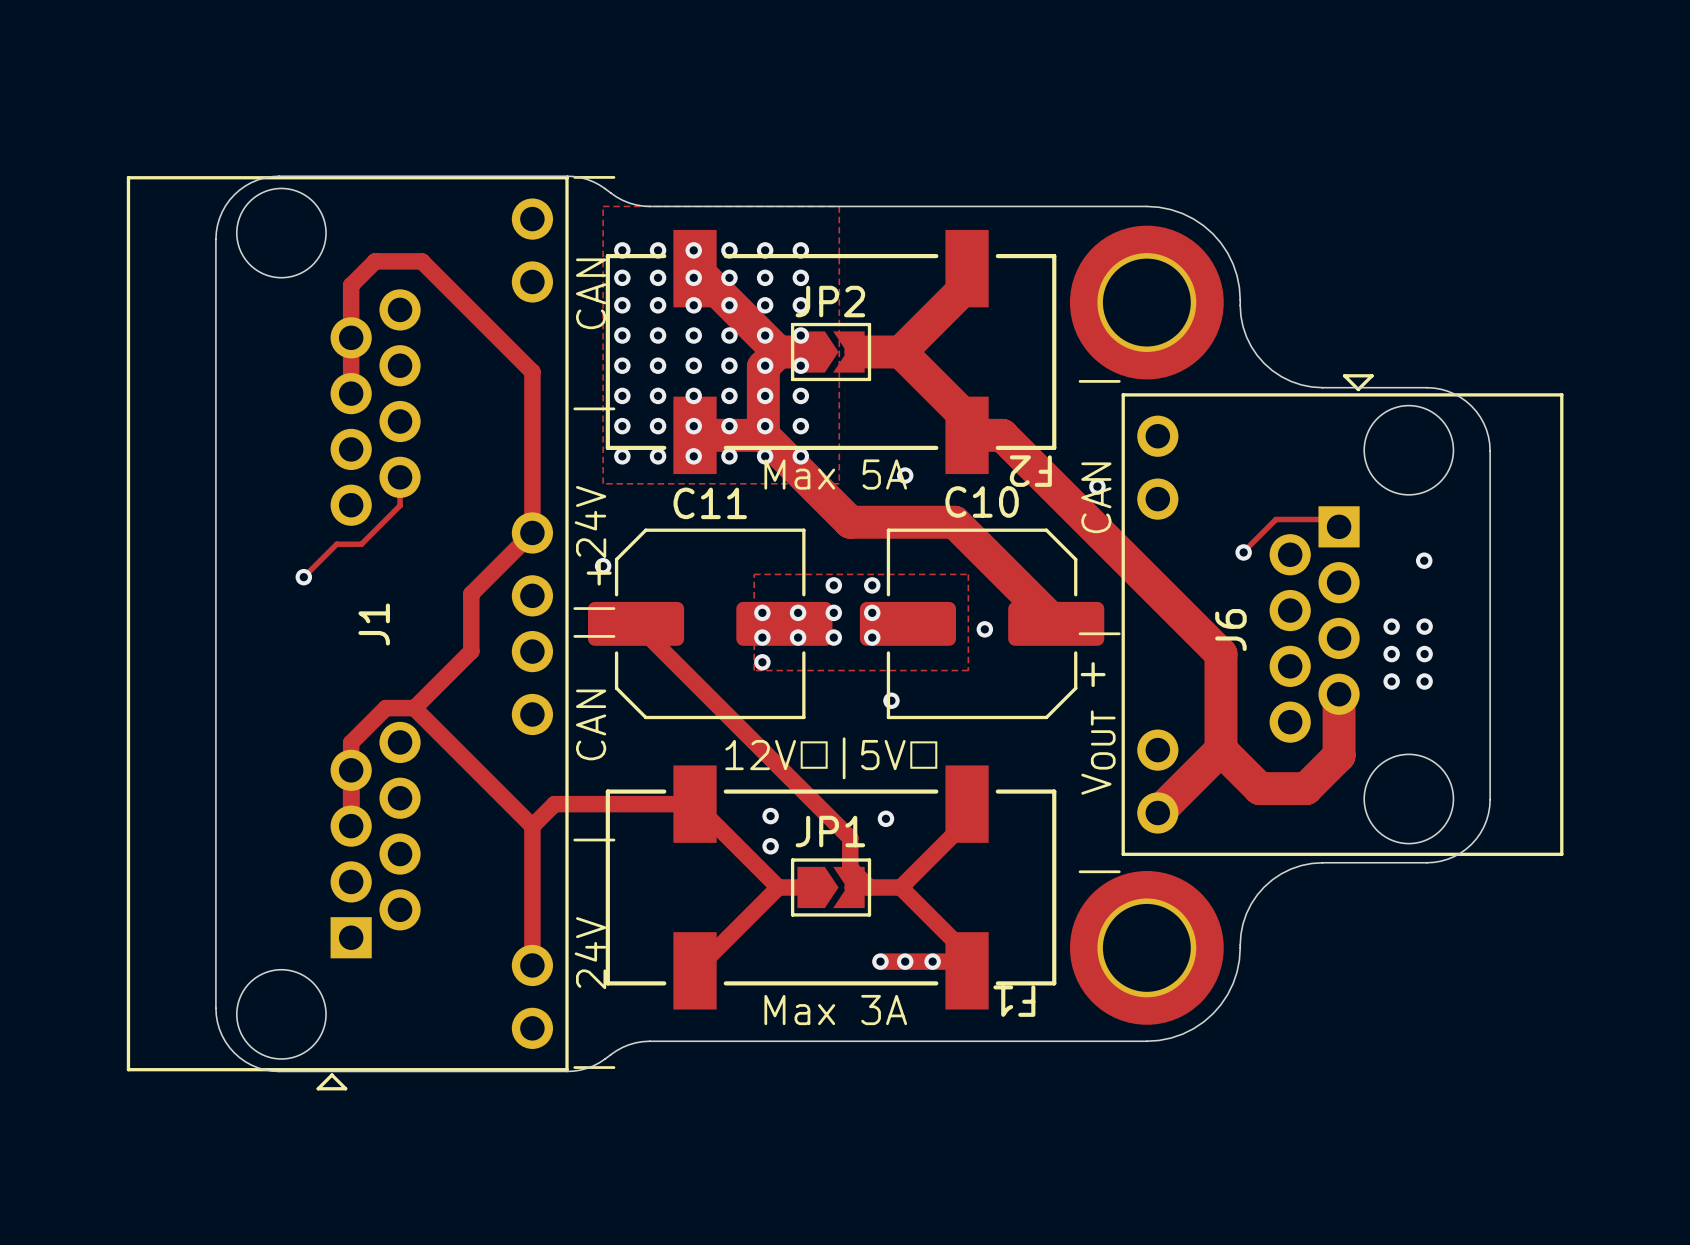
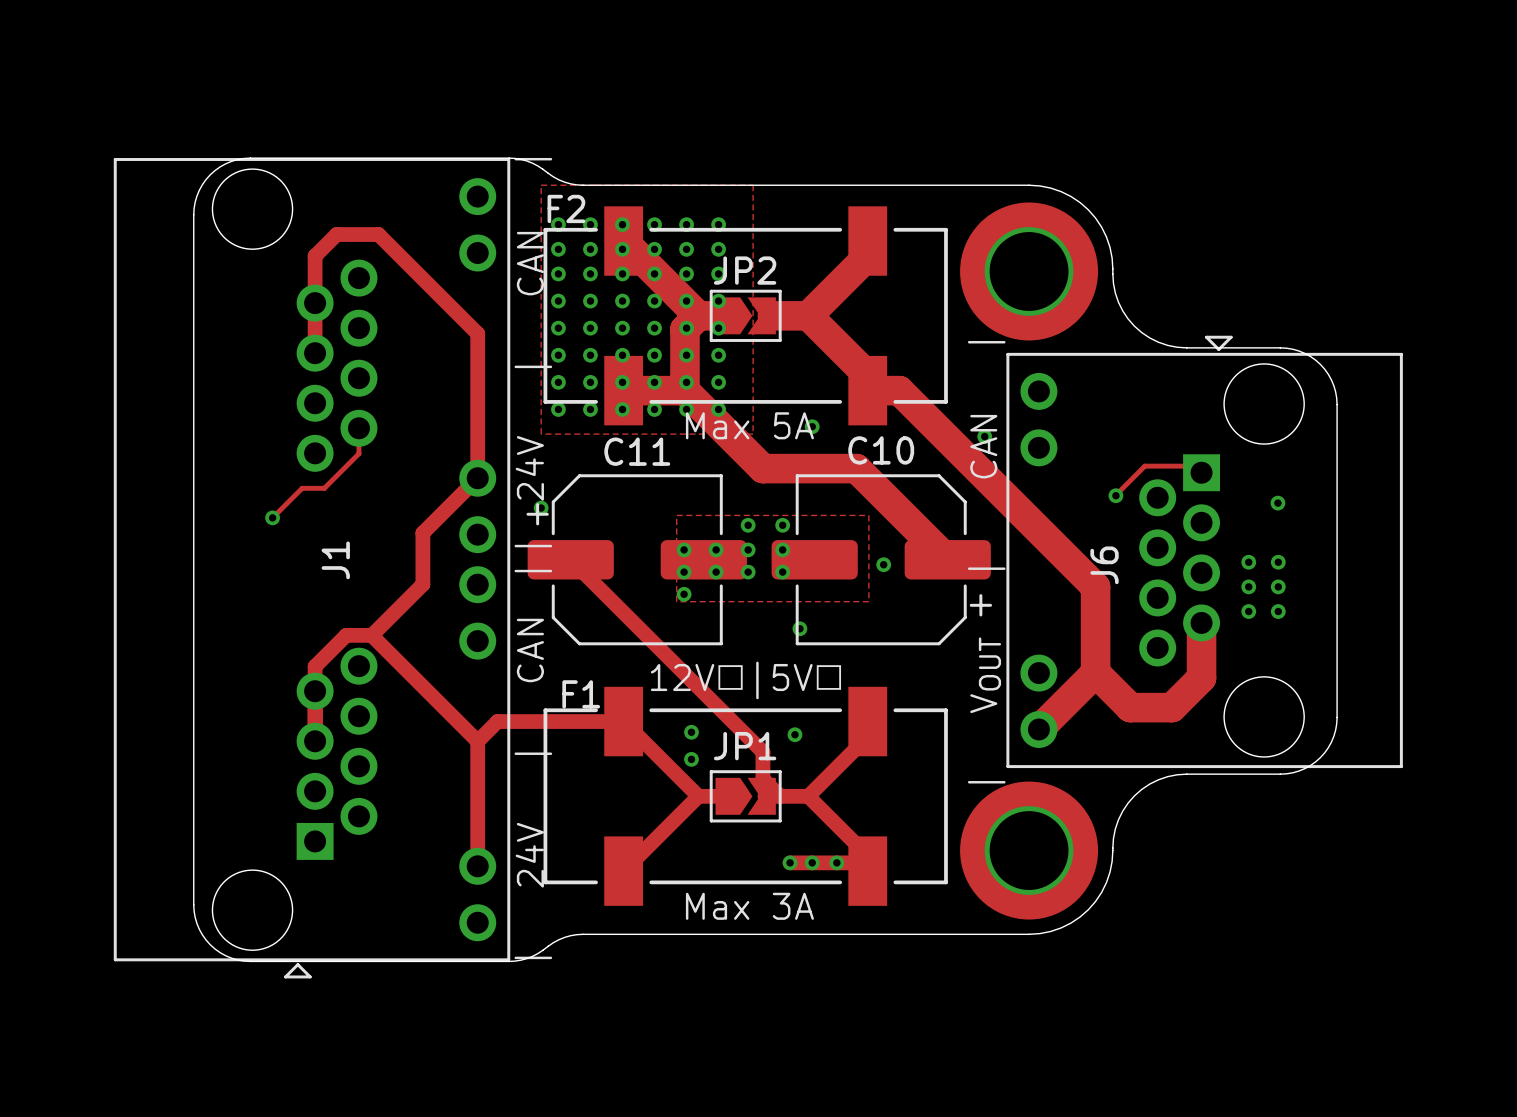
F2 name rotation: 0° (1030, 471) -> 180° (566, 208)
F2 name position: F2 (1030, 471) -> F2 (566, 208)
F1 name rotation: 0° (1014, 1001) -> 180° (581, 694)
F1 name position: F1 (1014, 1001) -> F1 (581, 694)

